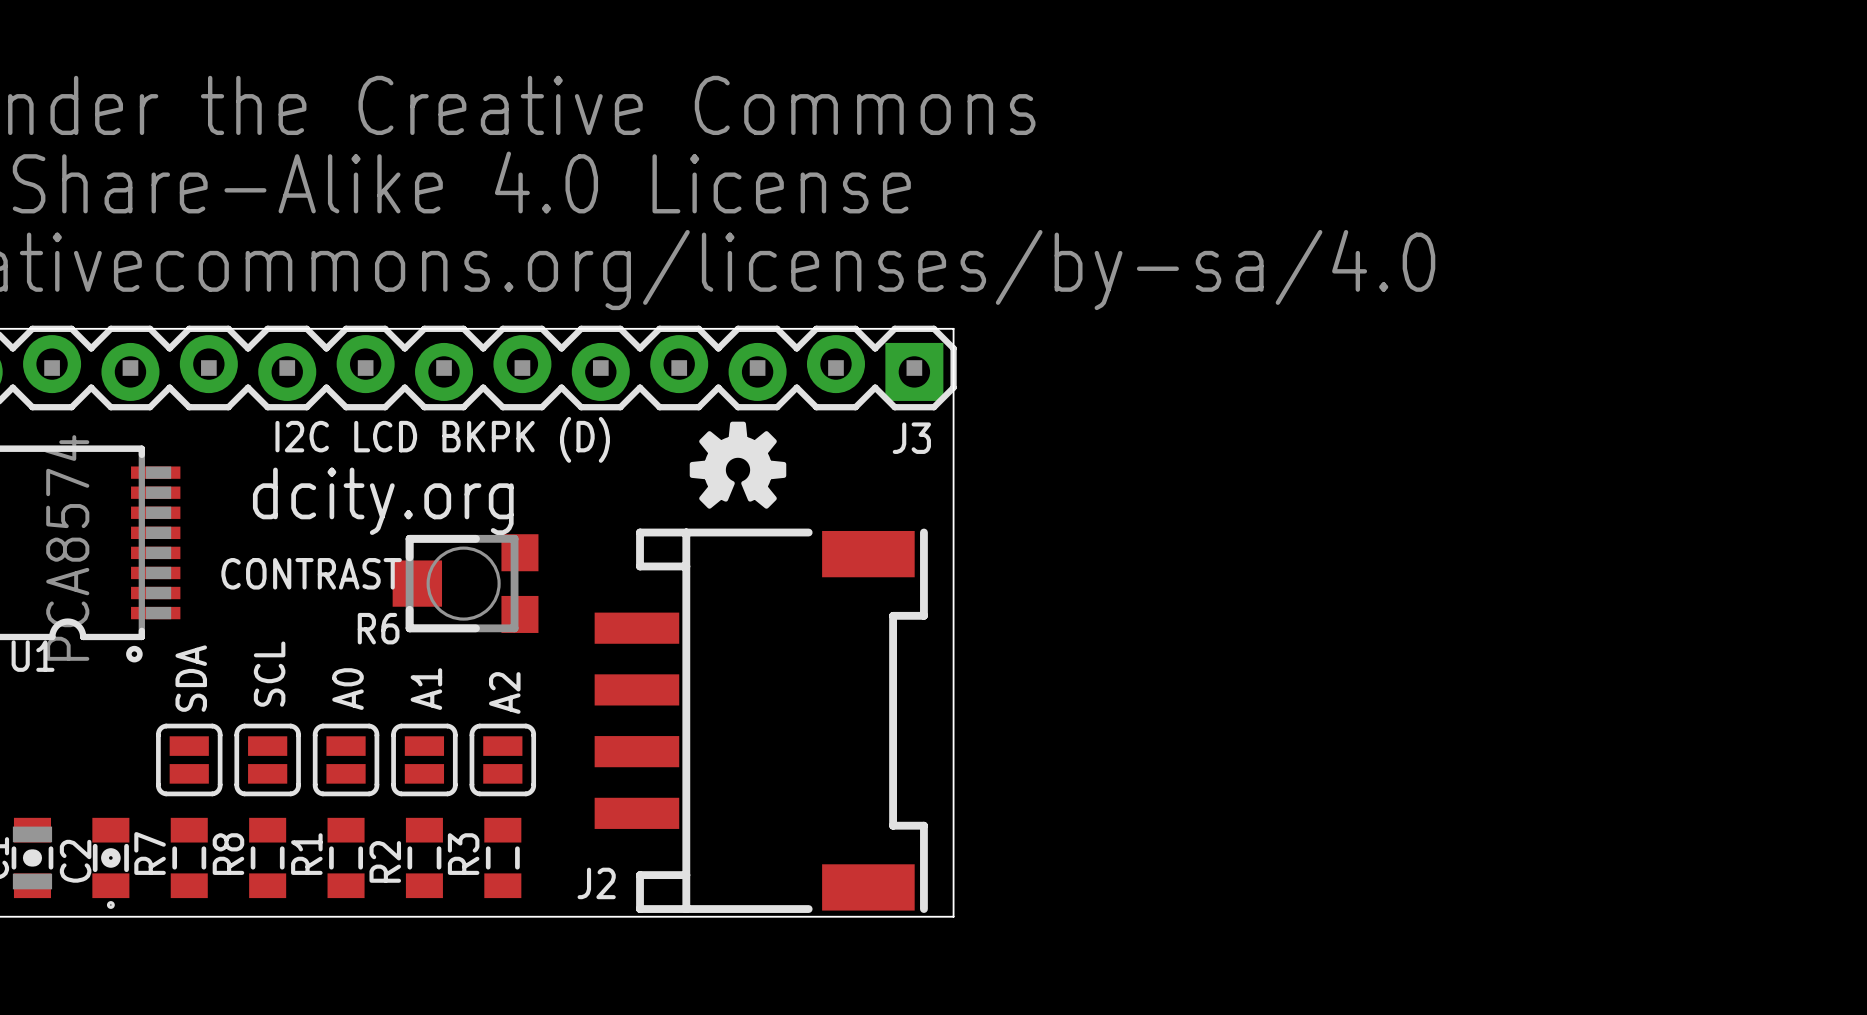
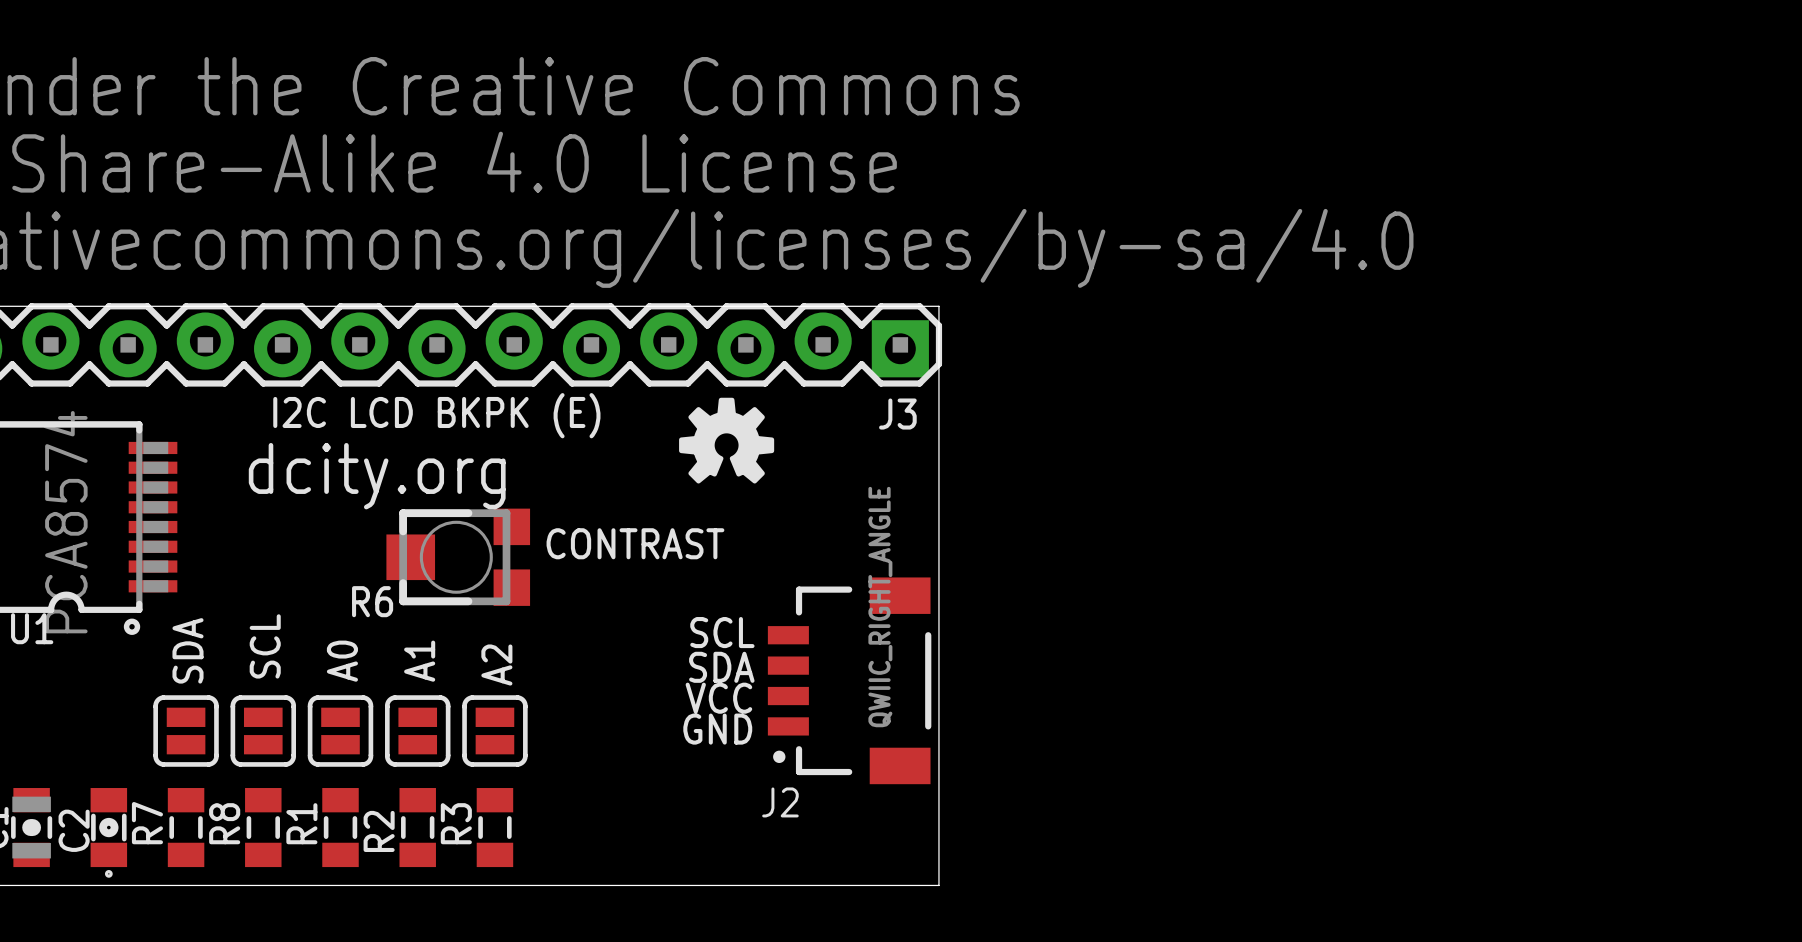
text: I2C LCD BKPK (D) (442, 439) -> I2C LCD BKPK (E) (436, 415)
J2 footprint: [594, 528, 928, 913] -> [767, 577, 932, 785]
text position: CONTRAST (311, 573) -> CONTRAST (635, 543)
J2 value: none -> QWIIC_RIGHT_ANGLE (880, 607)
text: none -> SCL (722, 632)
text: none -> SDA (721, 667)
text: none -> VCC (718, 698)
text: none -> GND (717, 729)
J2 name position: J2 (596, 883) -> J2 (780, 802)

